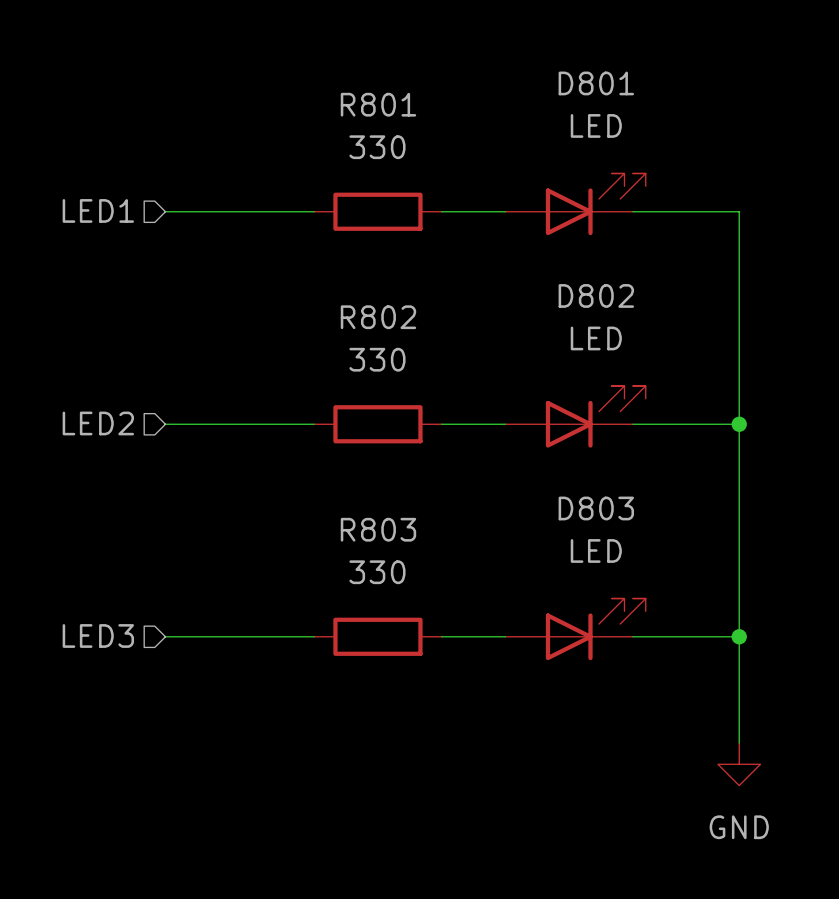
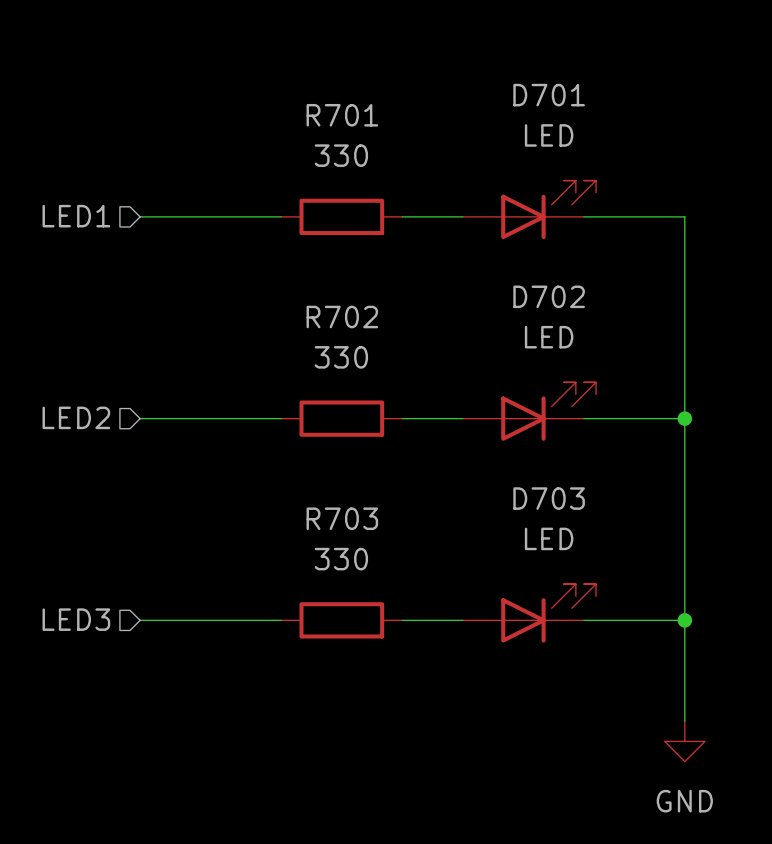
D801 name: D801 (596, 83) -> D701 (549, 95)
R801 name: R801 (378, 104) -> R701 (342, 115)
D802 name: D802 (596, 295) -> D702 (549, 296)
R802 name: R802 (378, 317) -> R702 (342, 317)
D803 name: D803 (596, 508) -> D703 (549, 498)
R803 name: R803 (378, 529) -> R703 (342, 518)

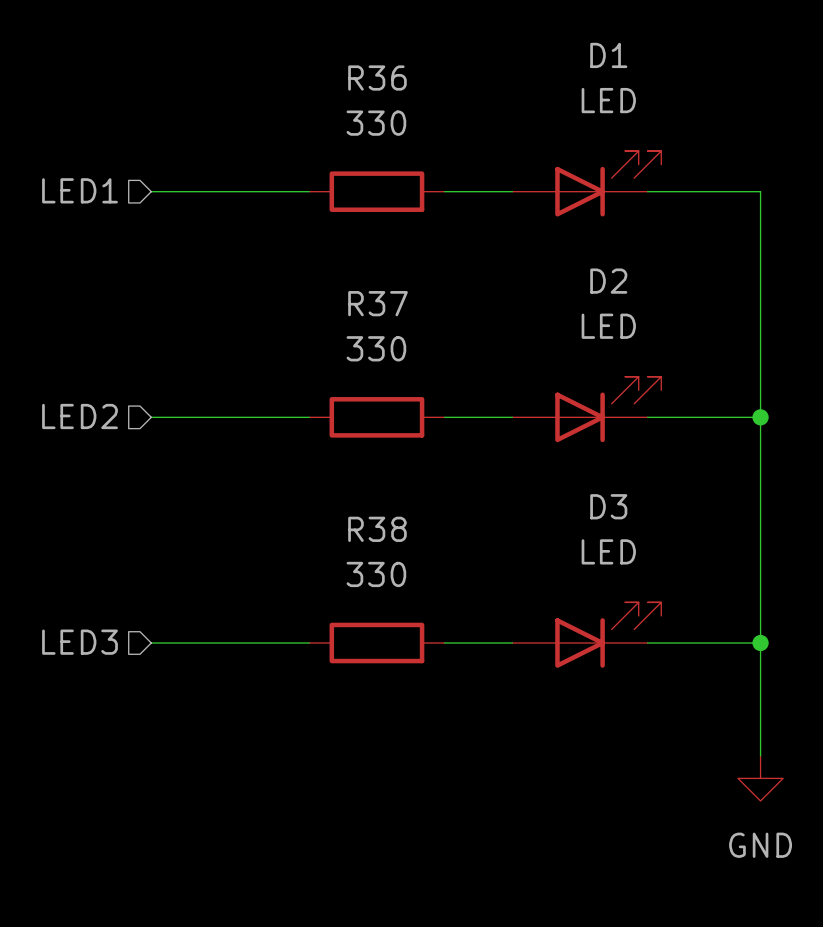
D701 name: D701 (549, 95) -> D1 (608, 55)
R701 name: R701 (342, 115) -> R36 (377, 78)
D702 name: D702 (549, 296) -> D2 (608, 281)
R702 name: R702 (342, 317) -> R37 (378, 303)
D703 name: D703 (549, 498) -> D3 (608, 506)
R703 name: R703 (342, 518) -> R38 (377, 529)

